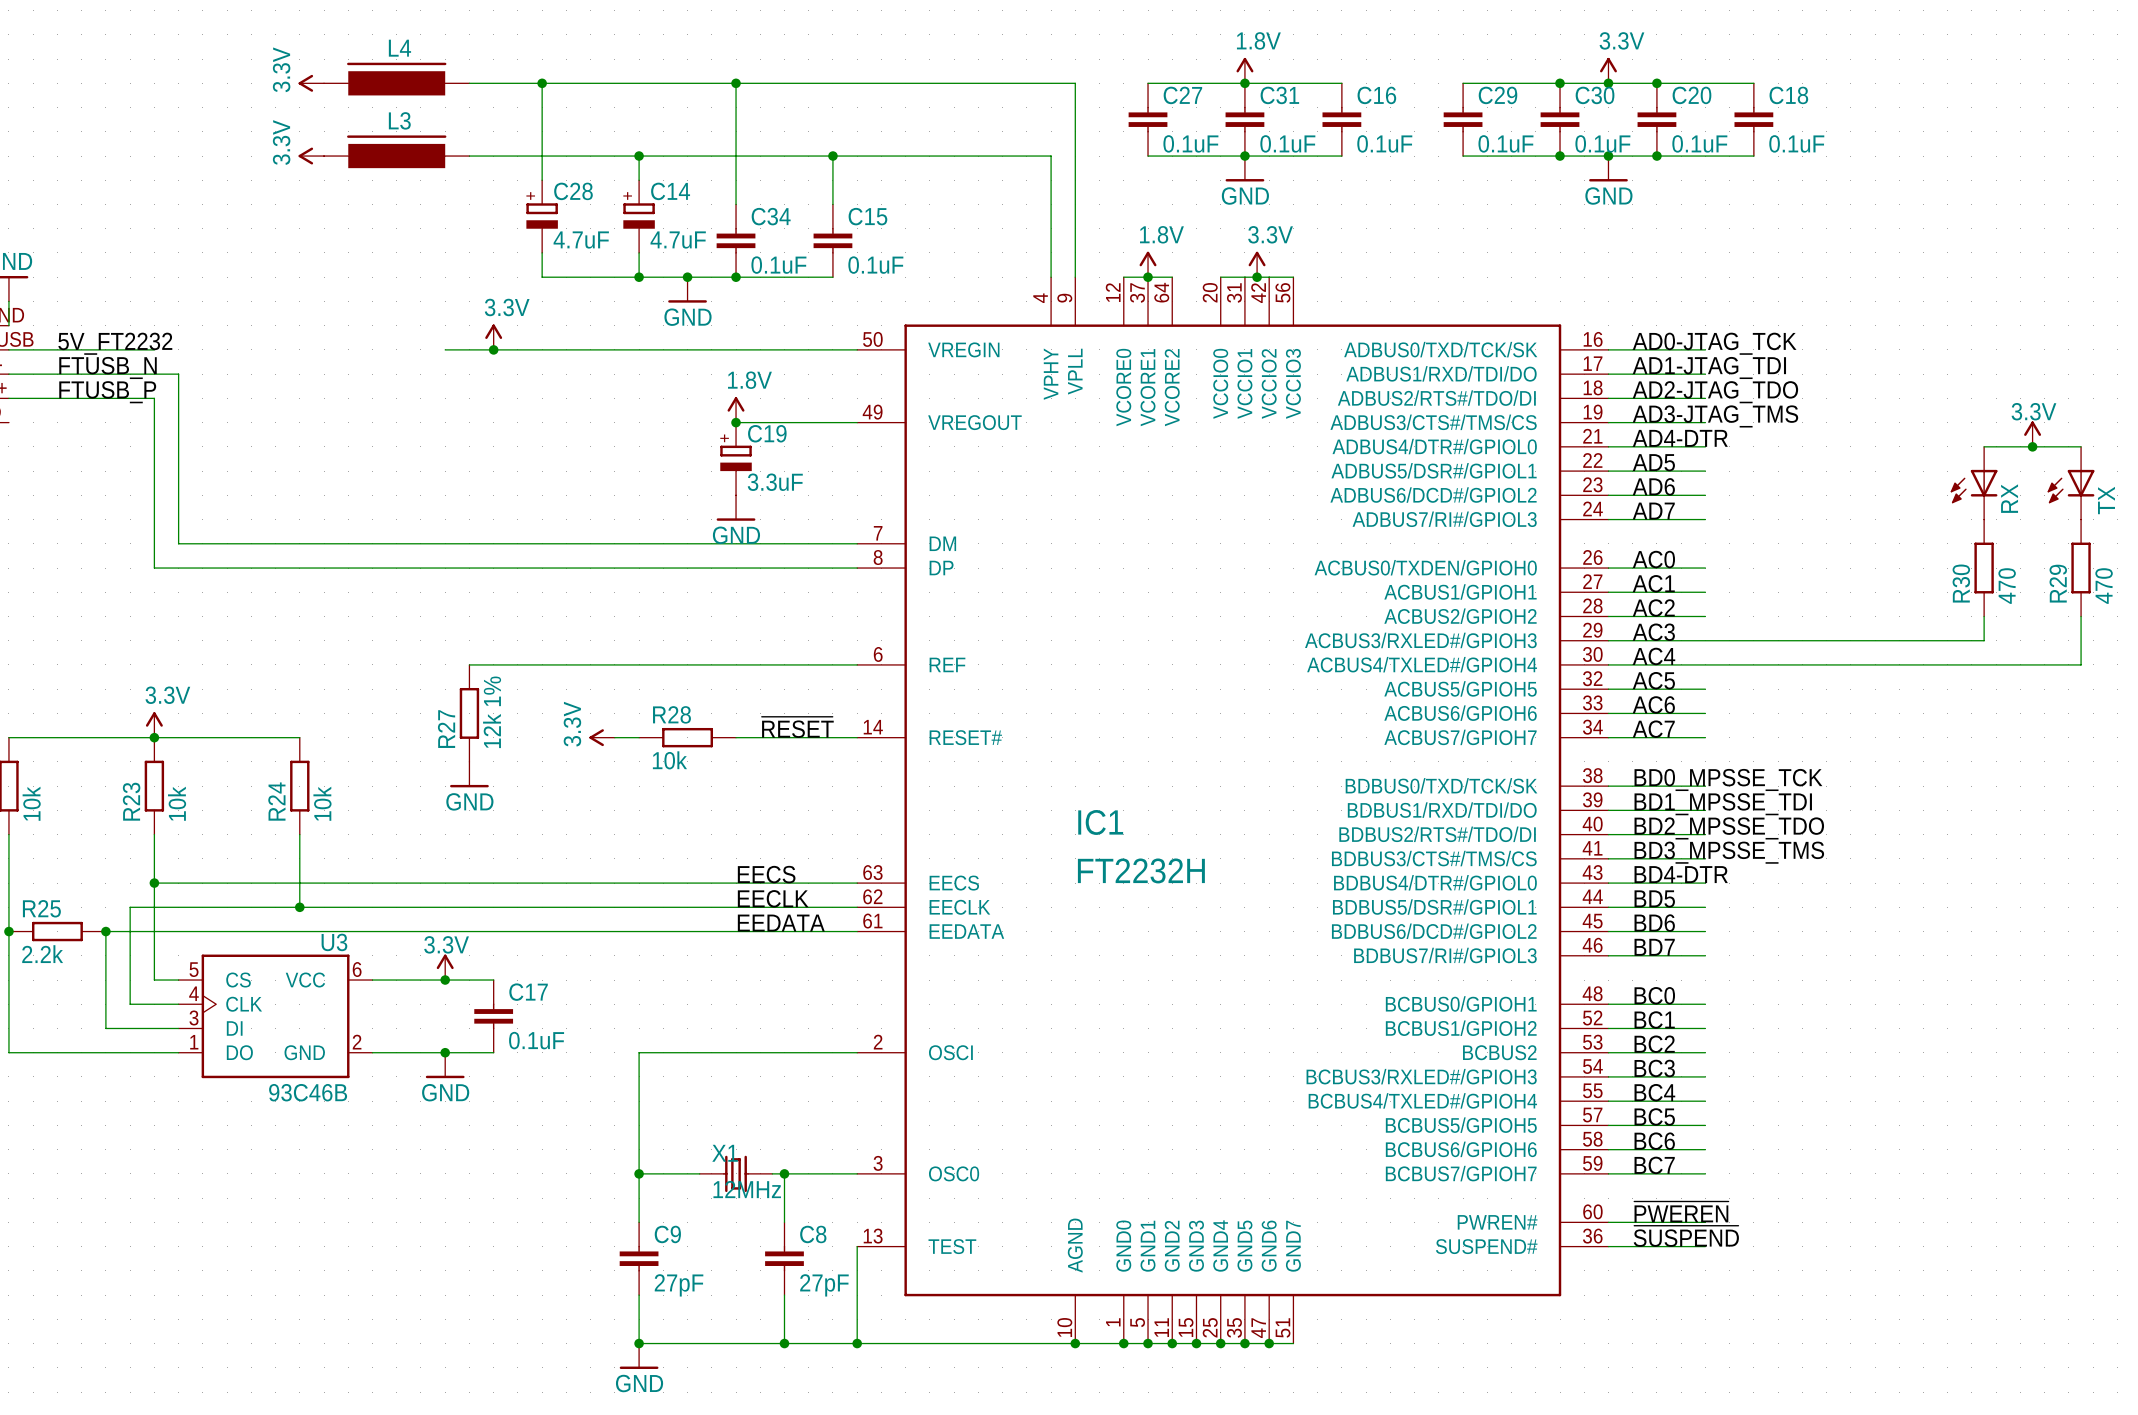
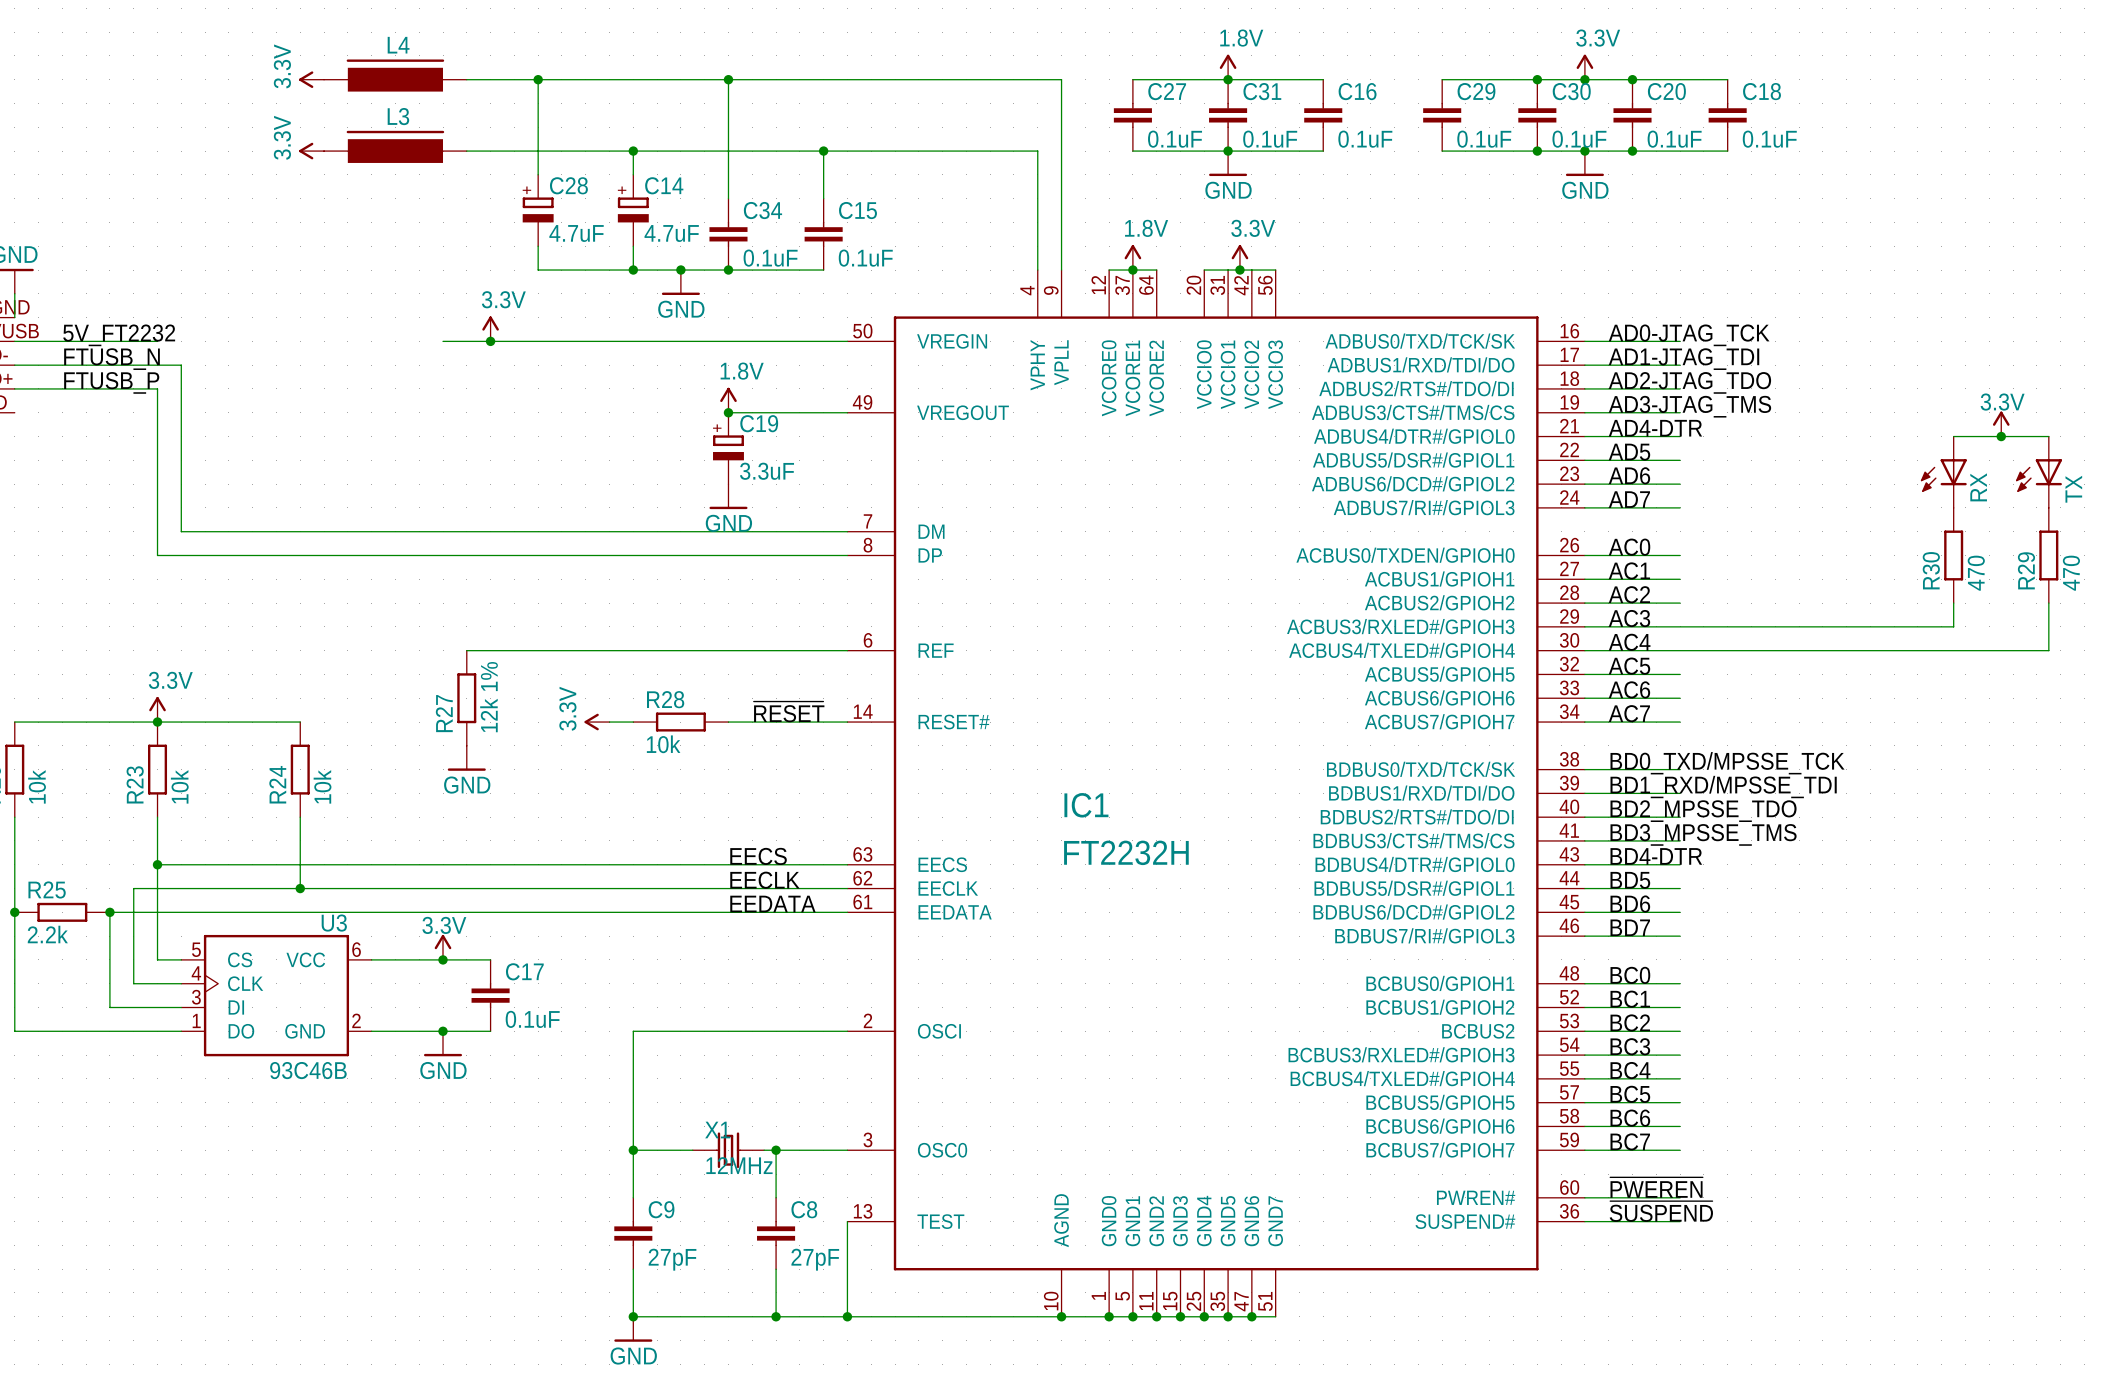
label: BD0_MPSSE_TCK (1728, 779) -> BD0_TXD/MPSSE_TCK (1727, 763)
label: BD1_MPSSE_TDI (1723, 804) -> BD1_RXD/MPSSE_TDI (1723, 787)

